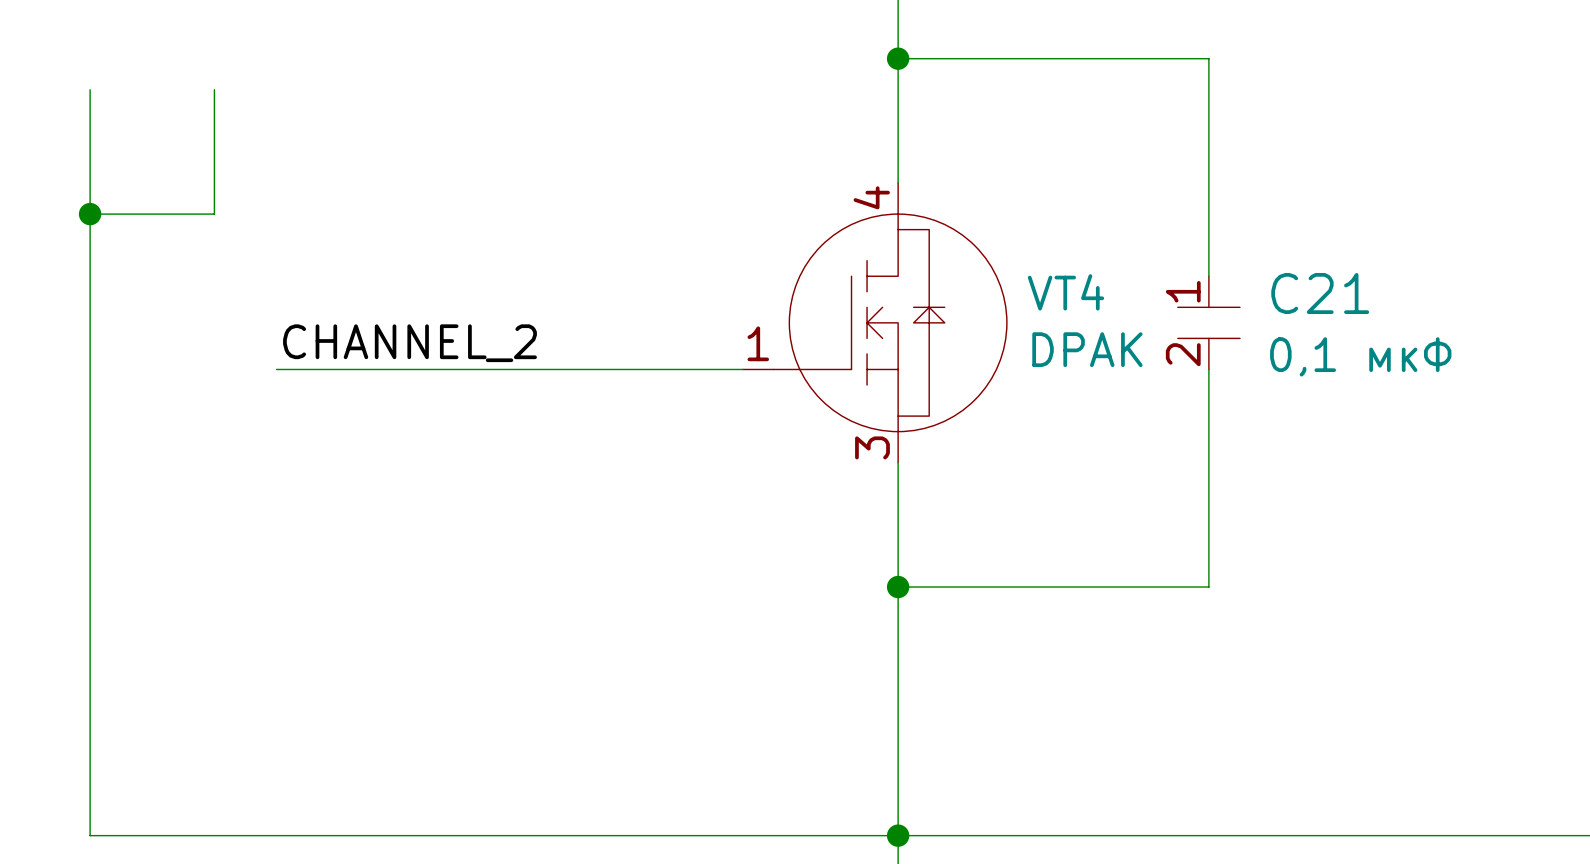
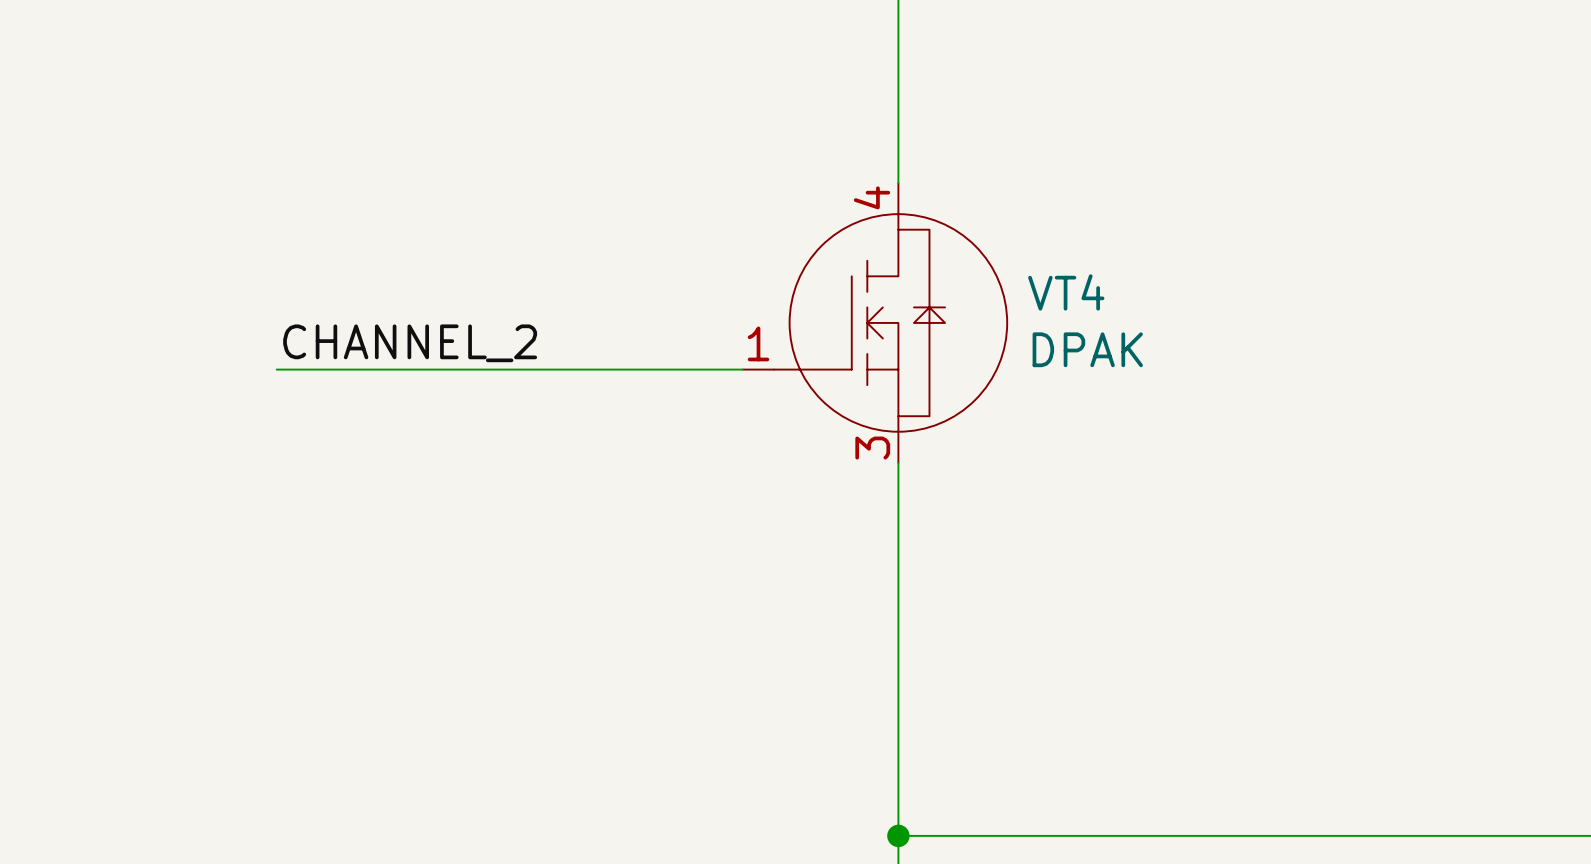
wire: (898, 58) (1208, 58) (1208, 276) -> none
junction: (898, 58) -> none
wire: (90, 89) (90, 835) (898, 835) -> none
wire: (214, 89) (214, 214) (90, 214) -> none
junction: (90, 214) -> none
C21: (1208, 322) -> none
wire: (1208, 369) (1208, 587) (898, 587) -> none
junction: (898, 587) -> none

